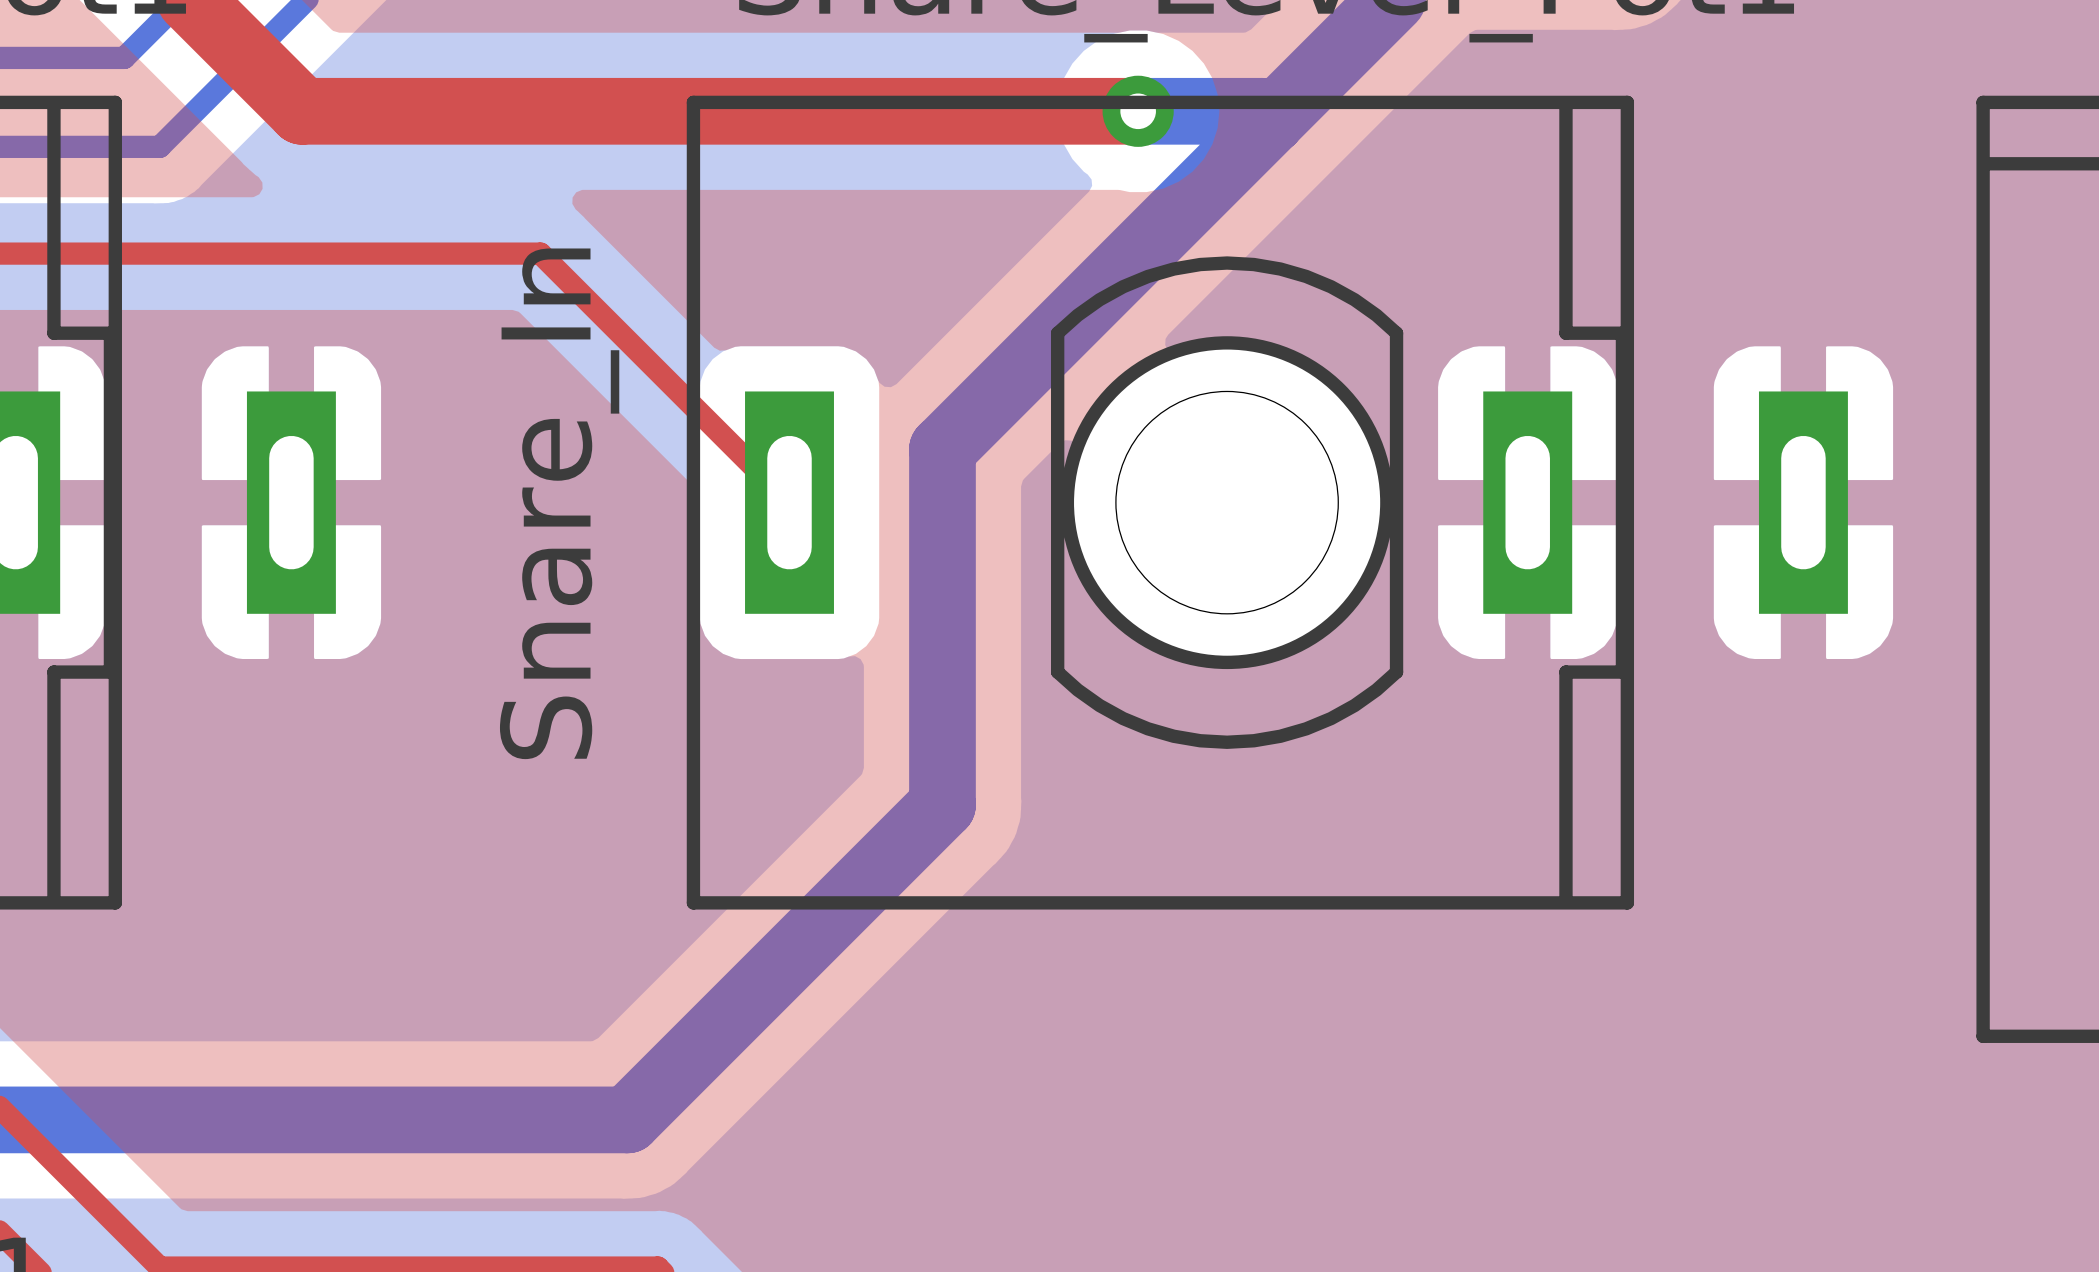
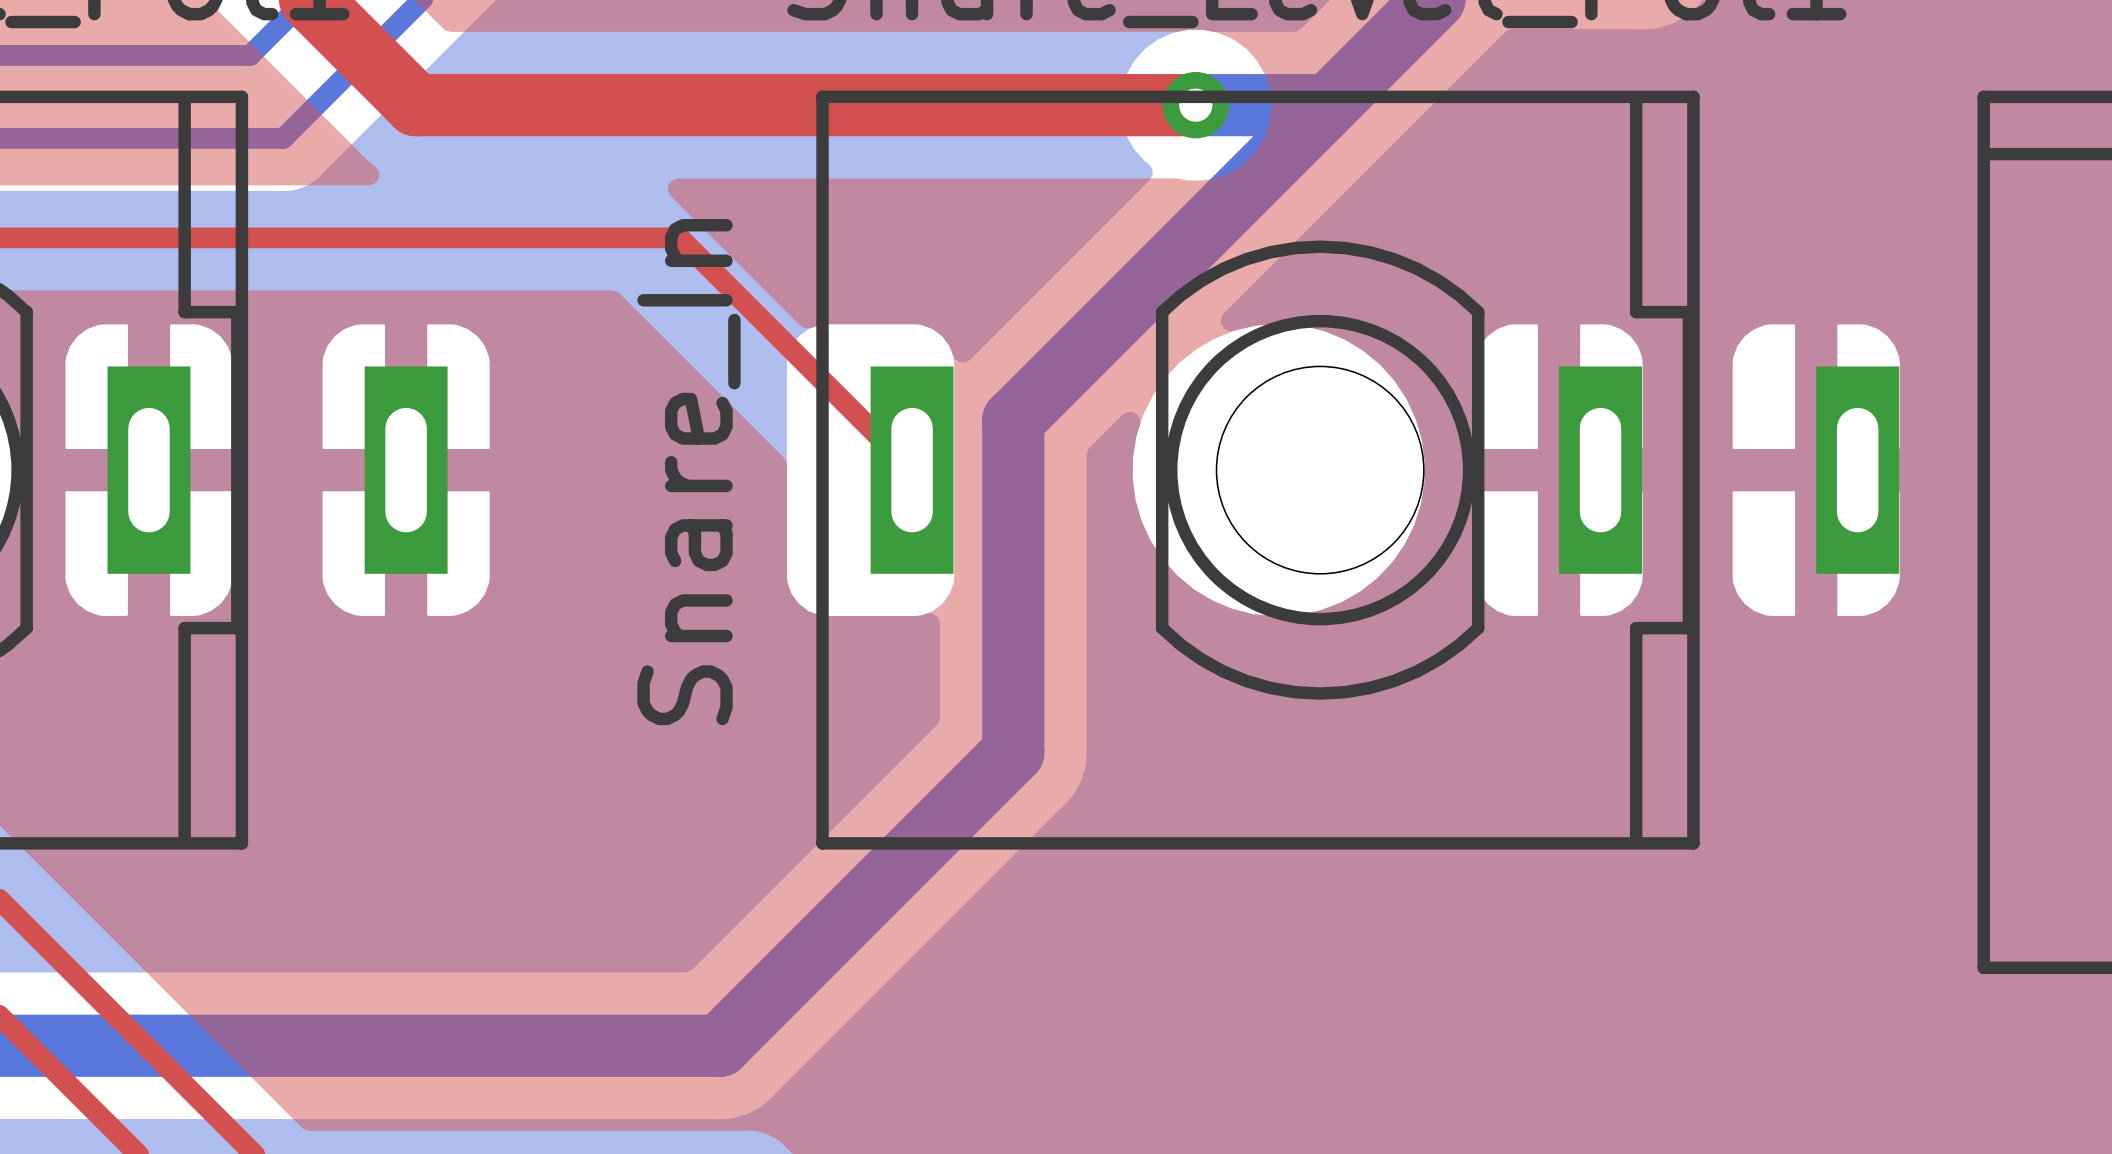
top track: (540, 253) (789, 502) -> (638, 237) (679, 237) (912, 470)
part position: (1267, 502) -> (1357, 470)

